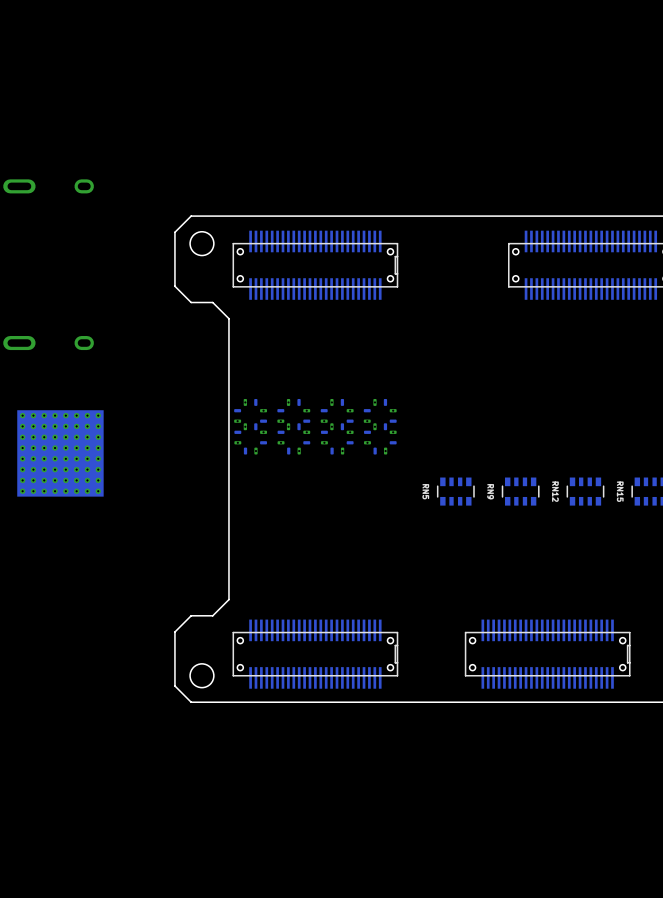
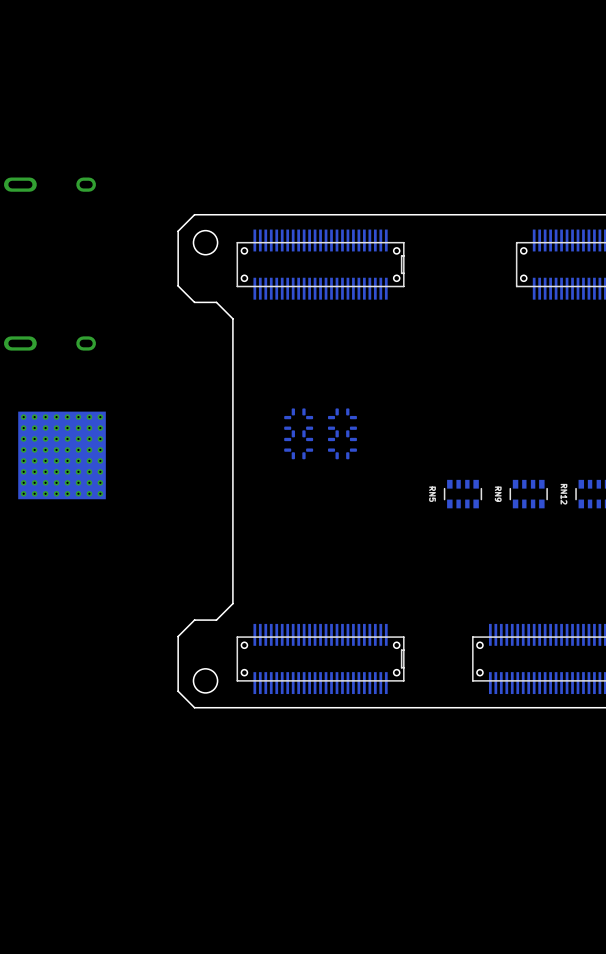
part footprint: [277, 398, 311, 455] -> [284, 408, 314, 460]
part footprint: [320, 398, 354, 455] -> [328, 408, 357, 460]
part: (250, 426) -> none
part: (380, 426) -> none

